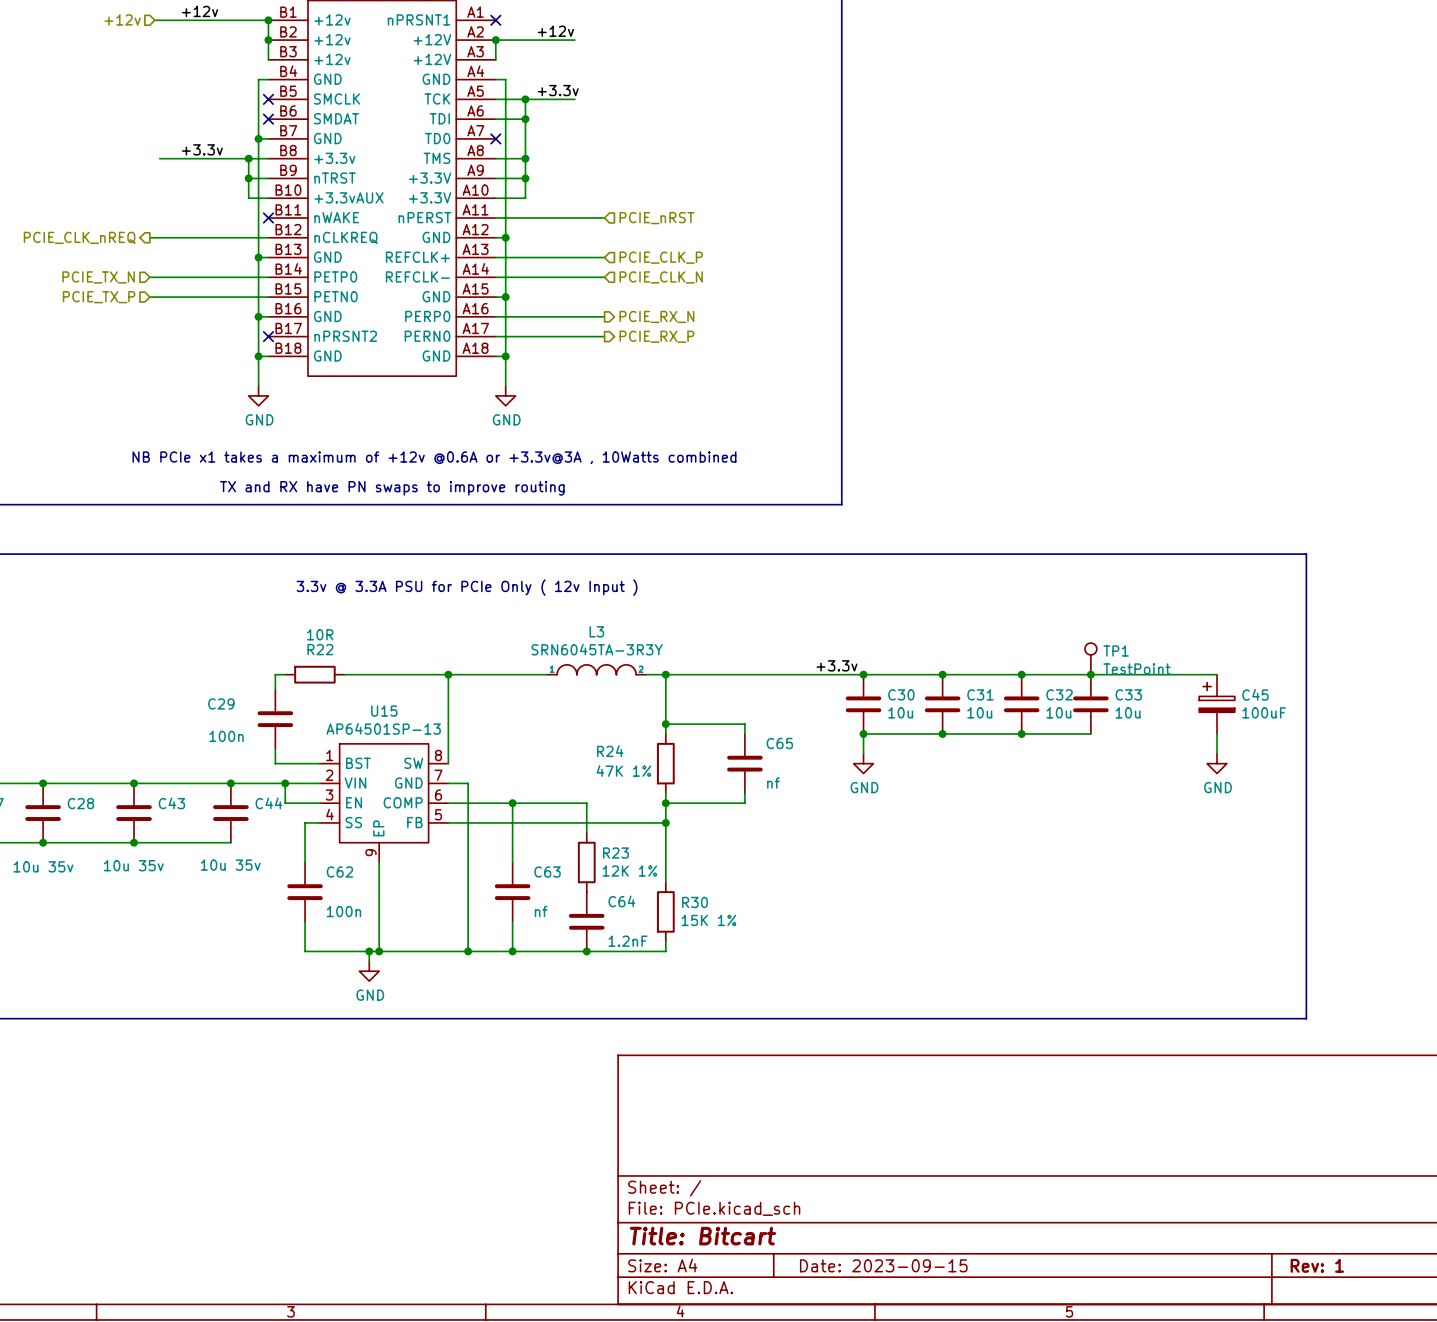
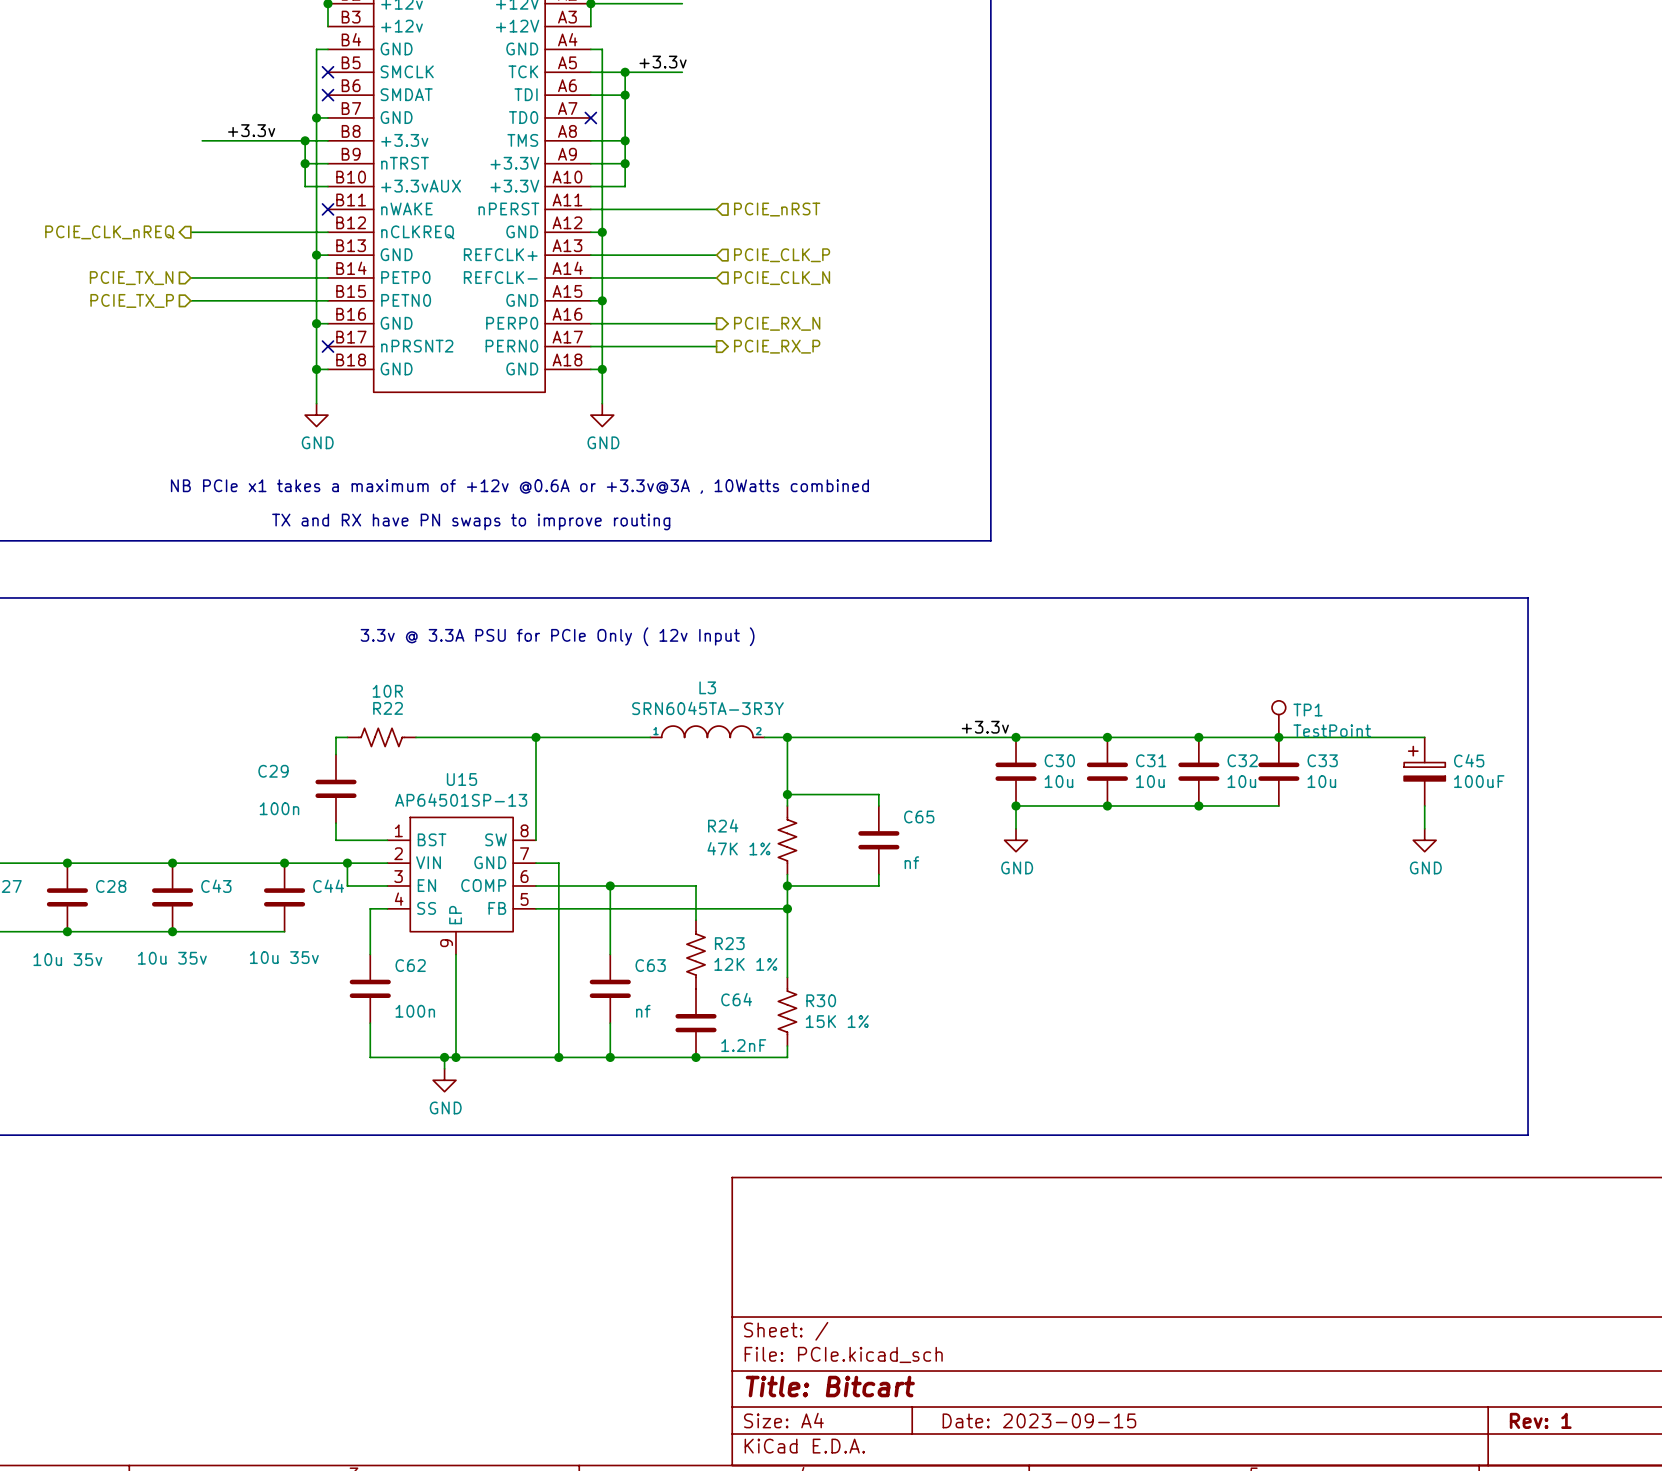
R22 symbol: [285, 665, 345, 684] -> [347, 728, 416, 747]
R24 symbol: [656, 733, 675, 794] -> [778, 805, 797, 875]
R23 symbol: [577, 832, 596, 893] -> [686, 920, 706, 989]
R30 symbol: [656, 882, 675, 942] -> [778, 977, 797, 1047]

